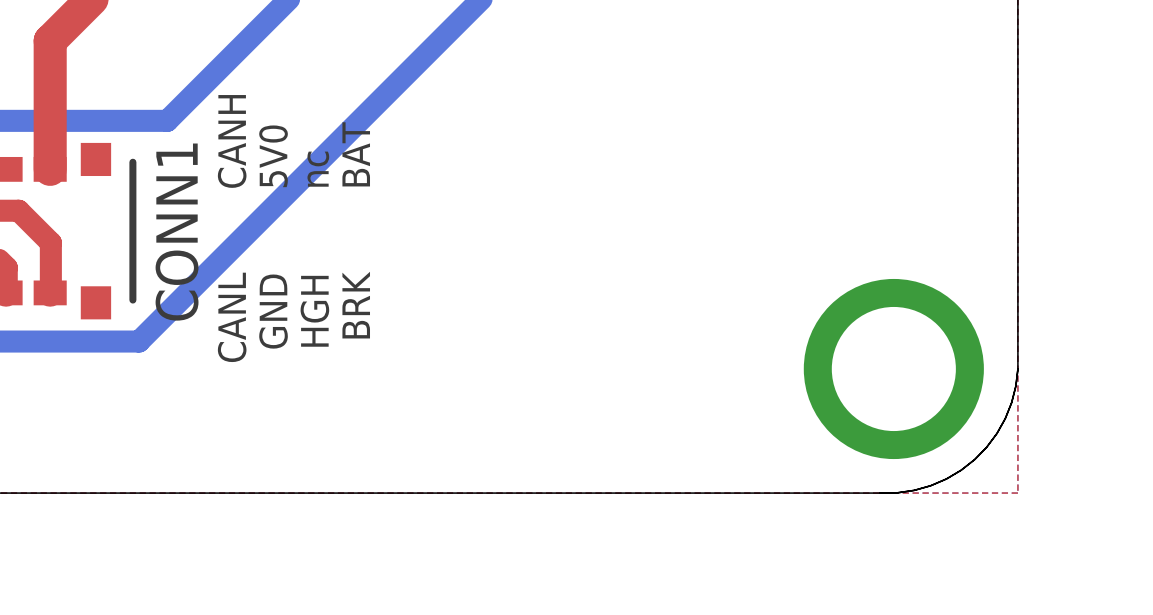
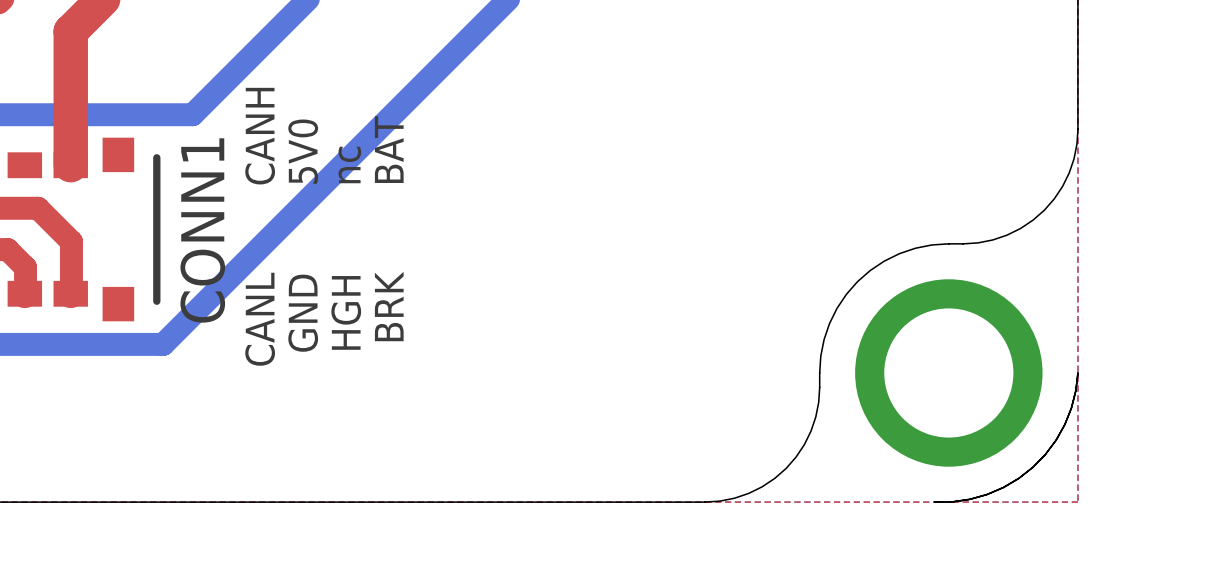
board edge: (1017, 134) (1017, 369) -> (1077, 129) (1074, 158) (1069, 173) (1054, 198) (1033, 220) (1020, 228) (992, 239) (978, 242) (931, 244) (899, 253) (884, 261) (857, 281) (836, 308) (829, 323) (820, 356) (818, 402) (815, 417) (804, 444) (795, 457) (774, 478) (748, 493) (734, 498) (704, 502)
board edge: (659, 493) (880, 493) -> none

